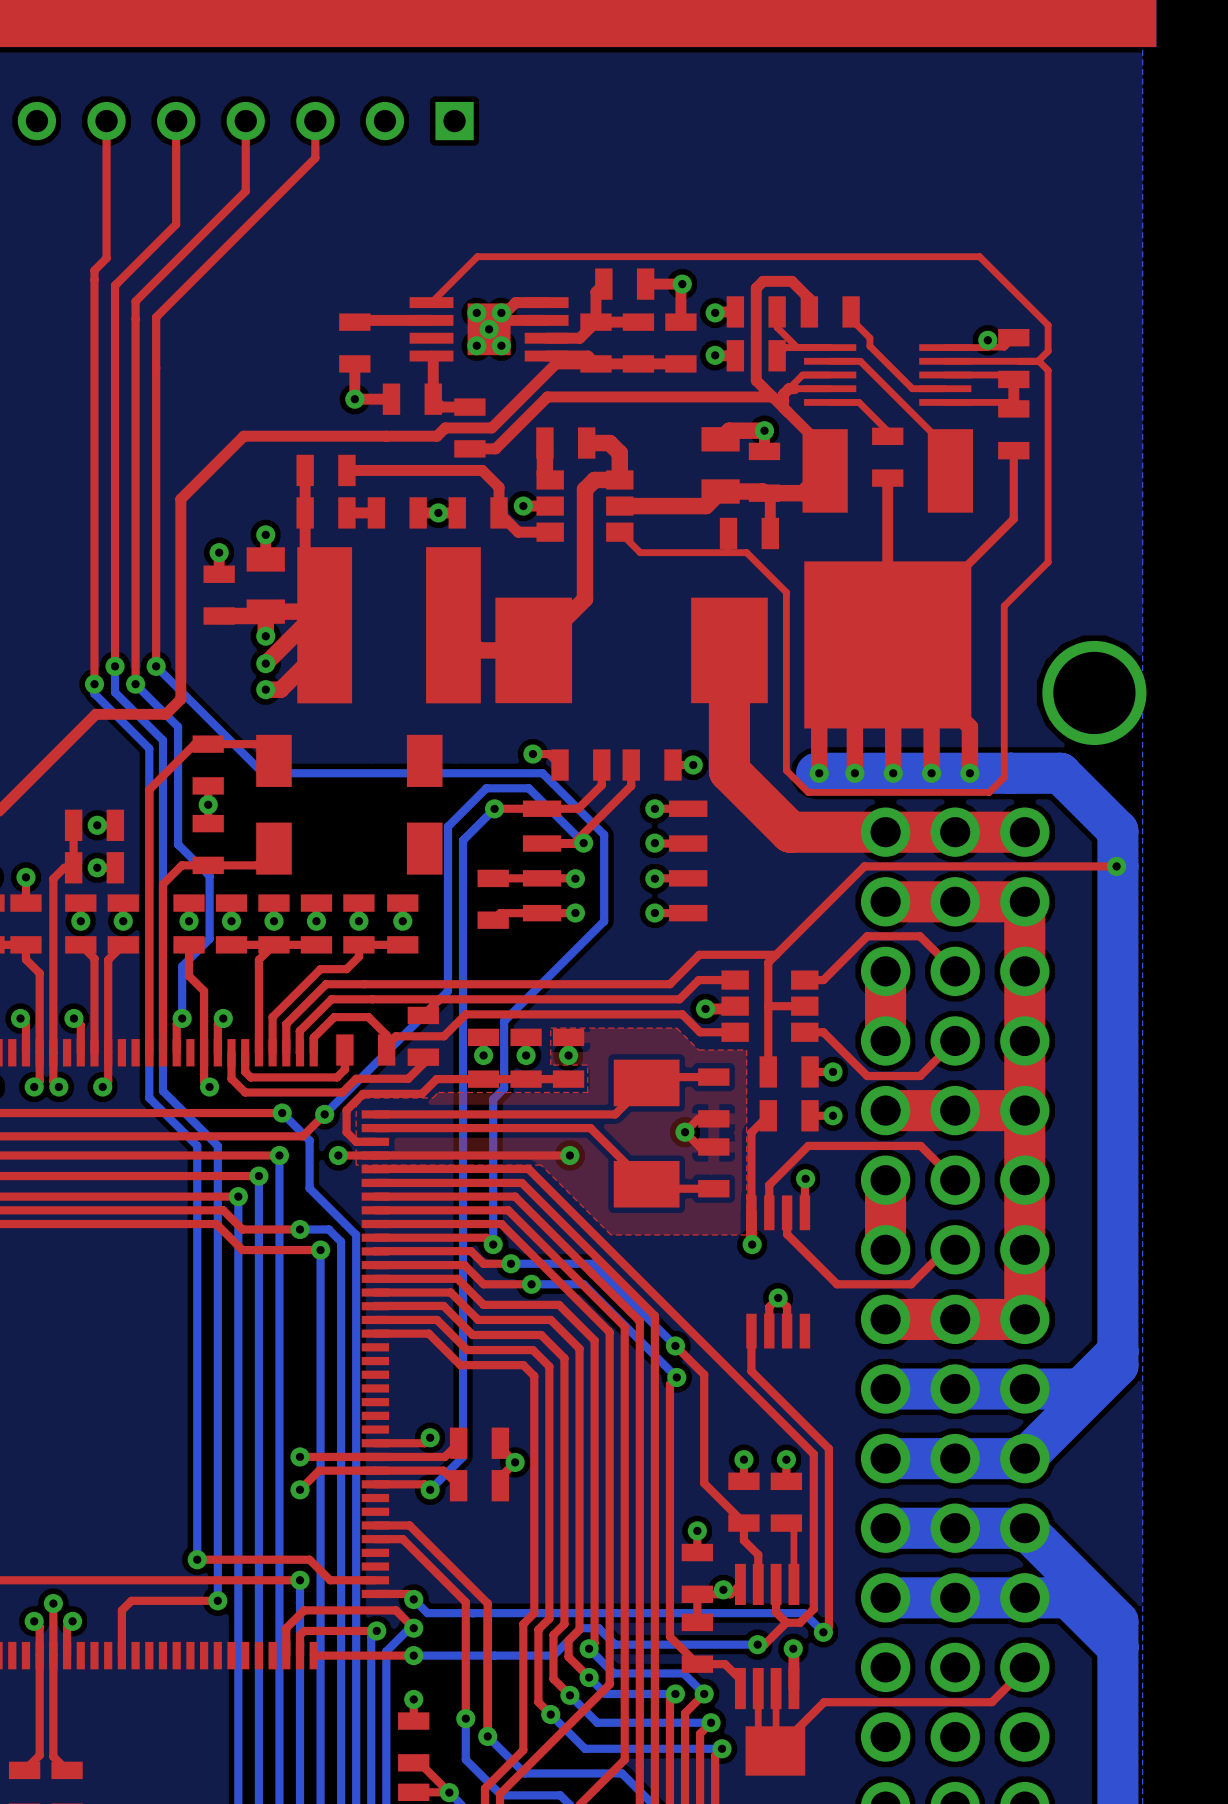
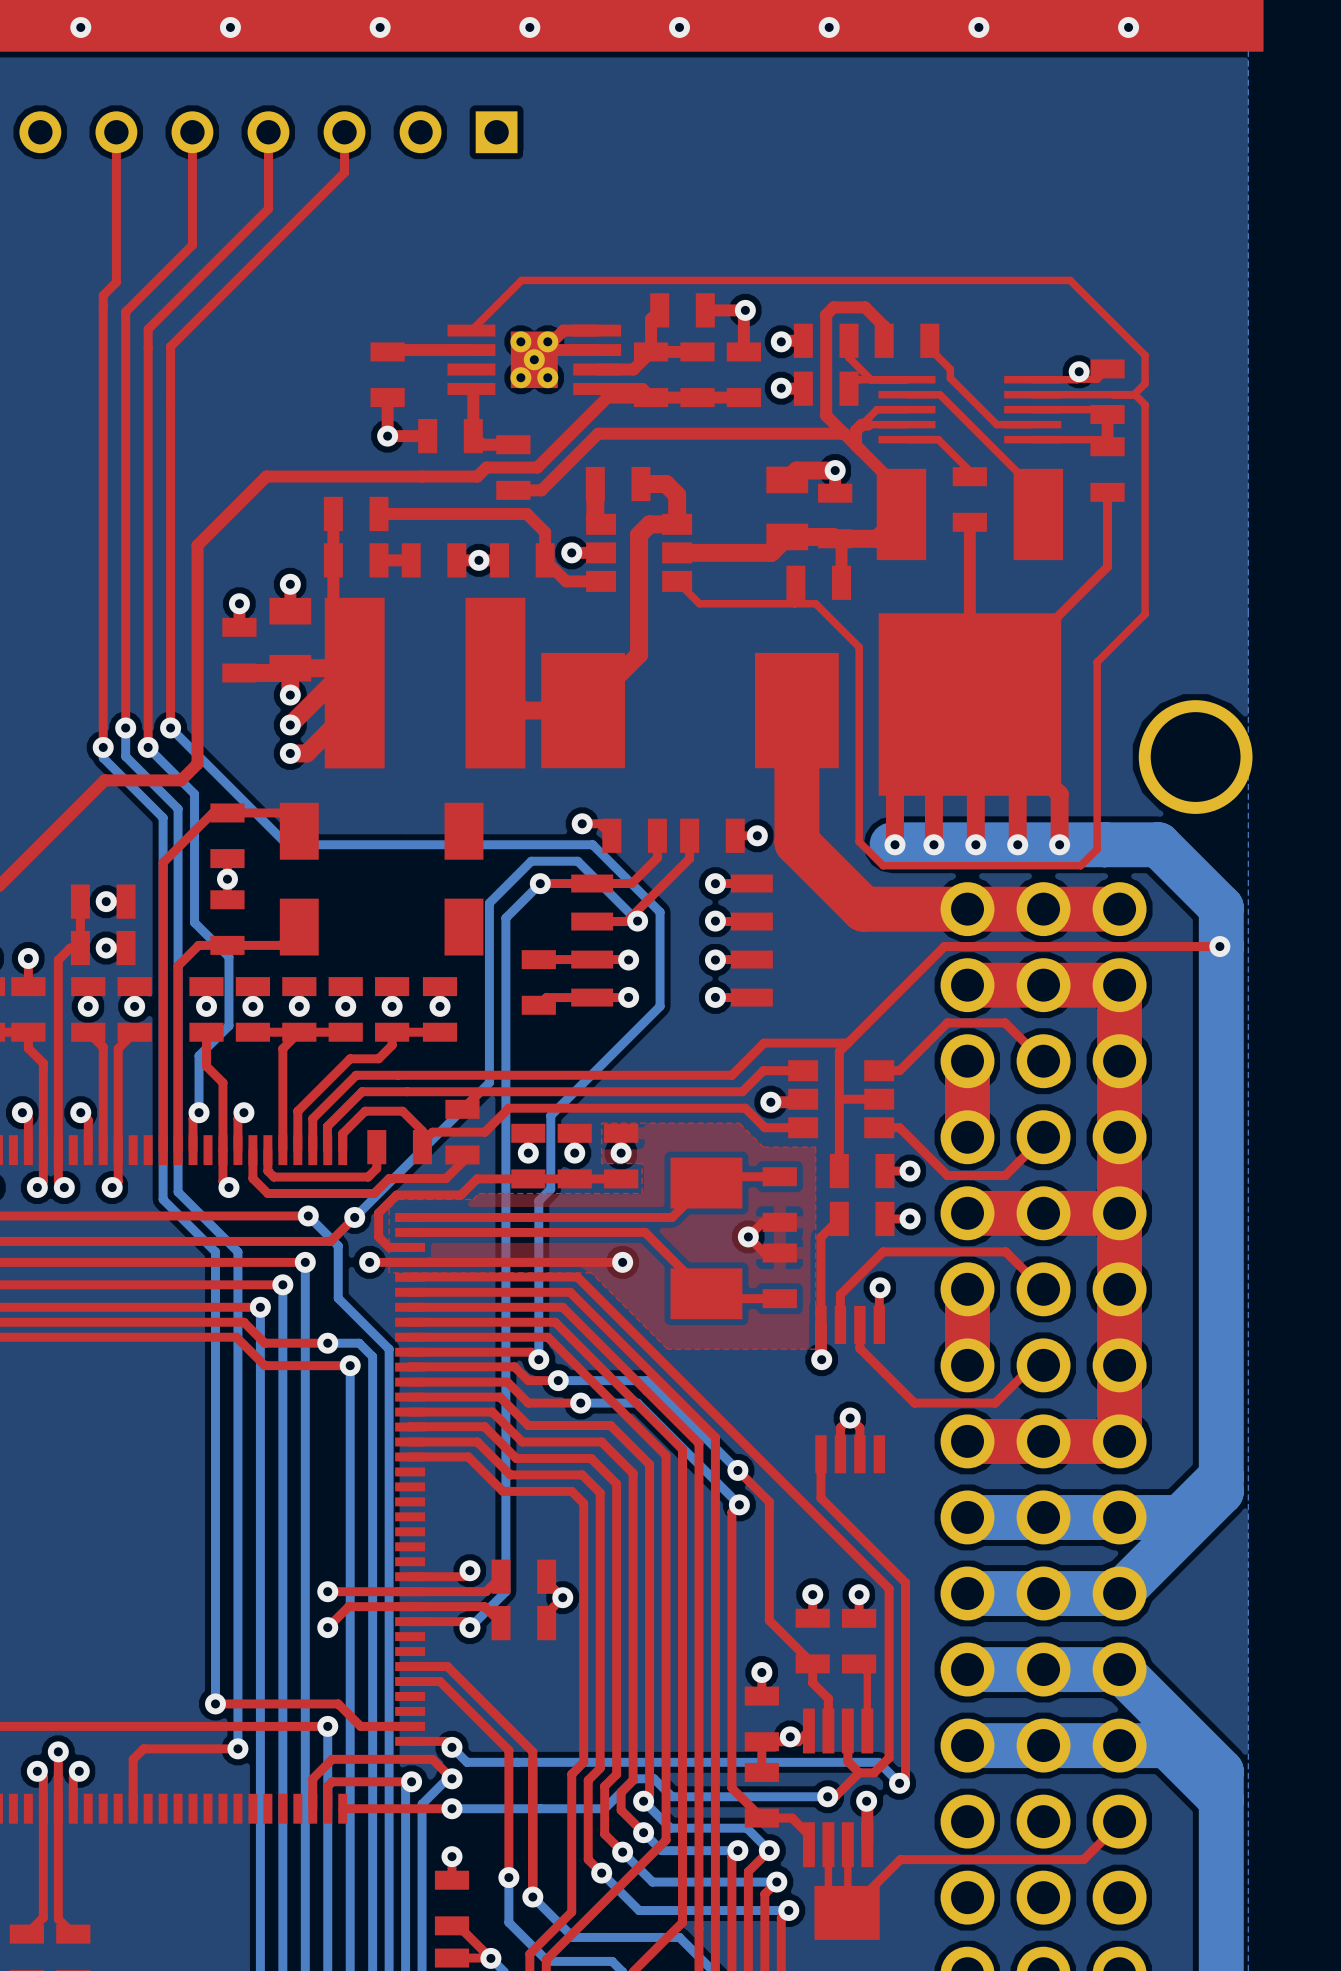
via: none -> (80, 27)
via: none -> (230, 27)
via: none -> (380, 27)
via: none -> (529, 27)
via: none -> (679, 27)
via: none -> (829, 27)
via: none -> (978, 27)
via: none -> (1128, 27)

